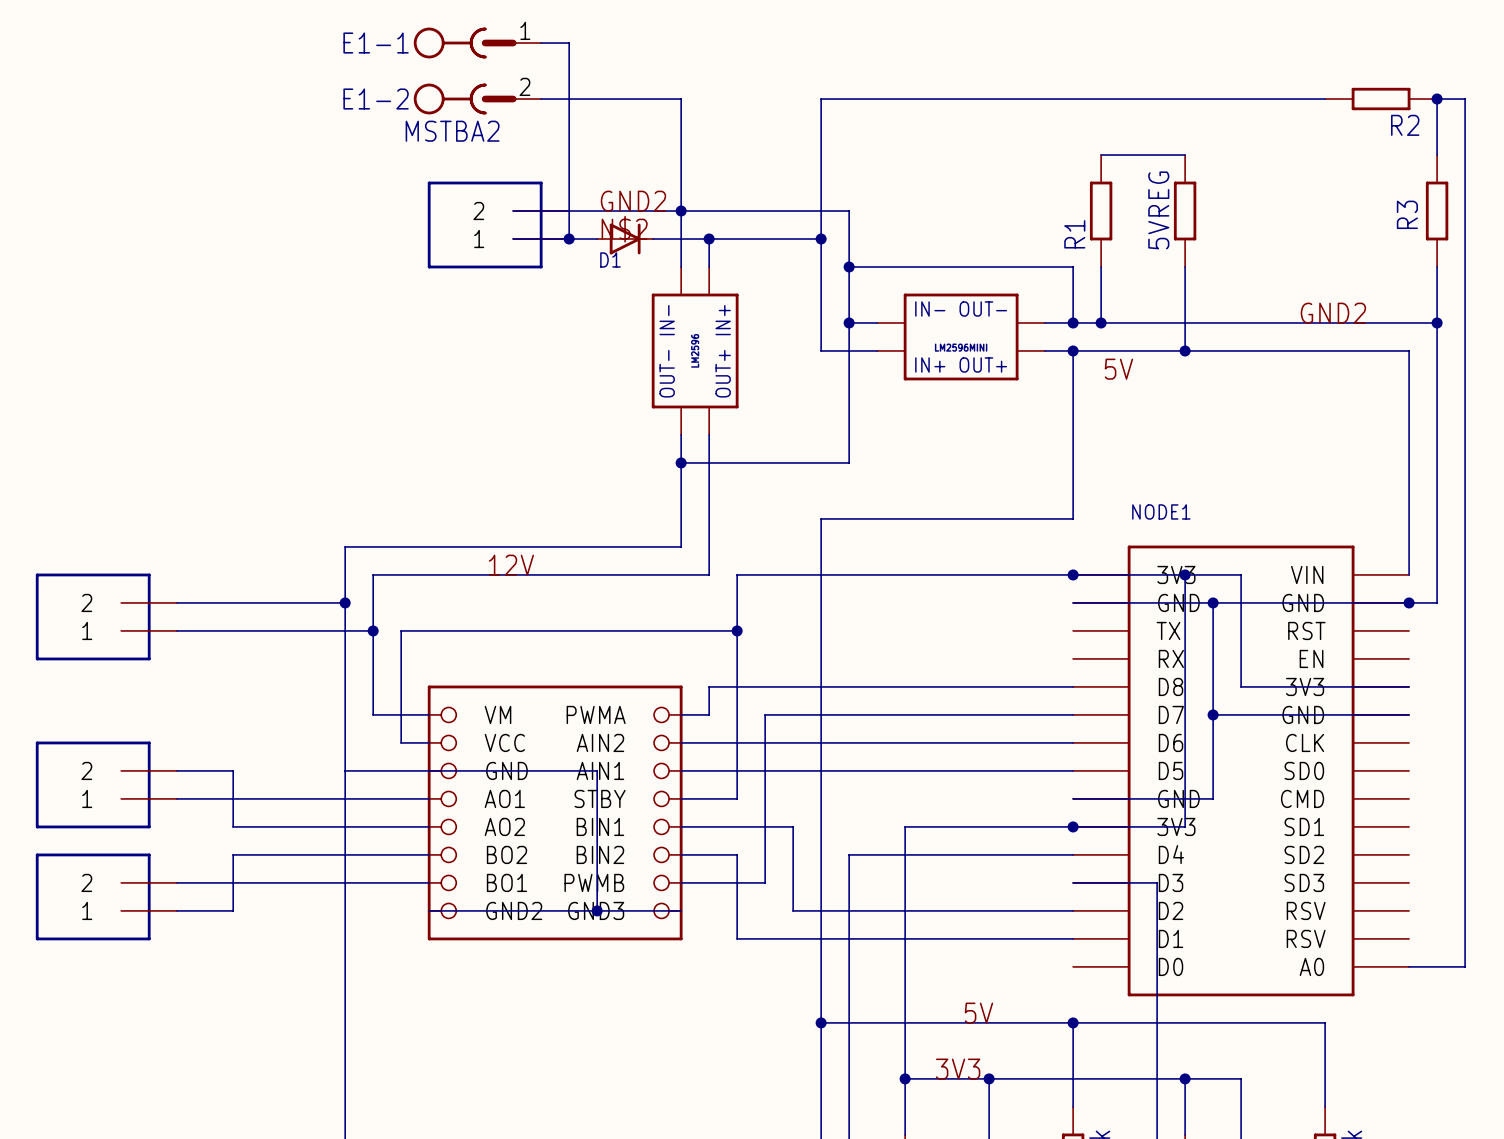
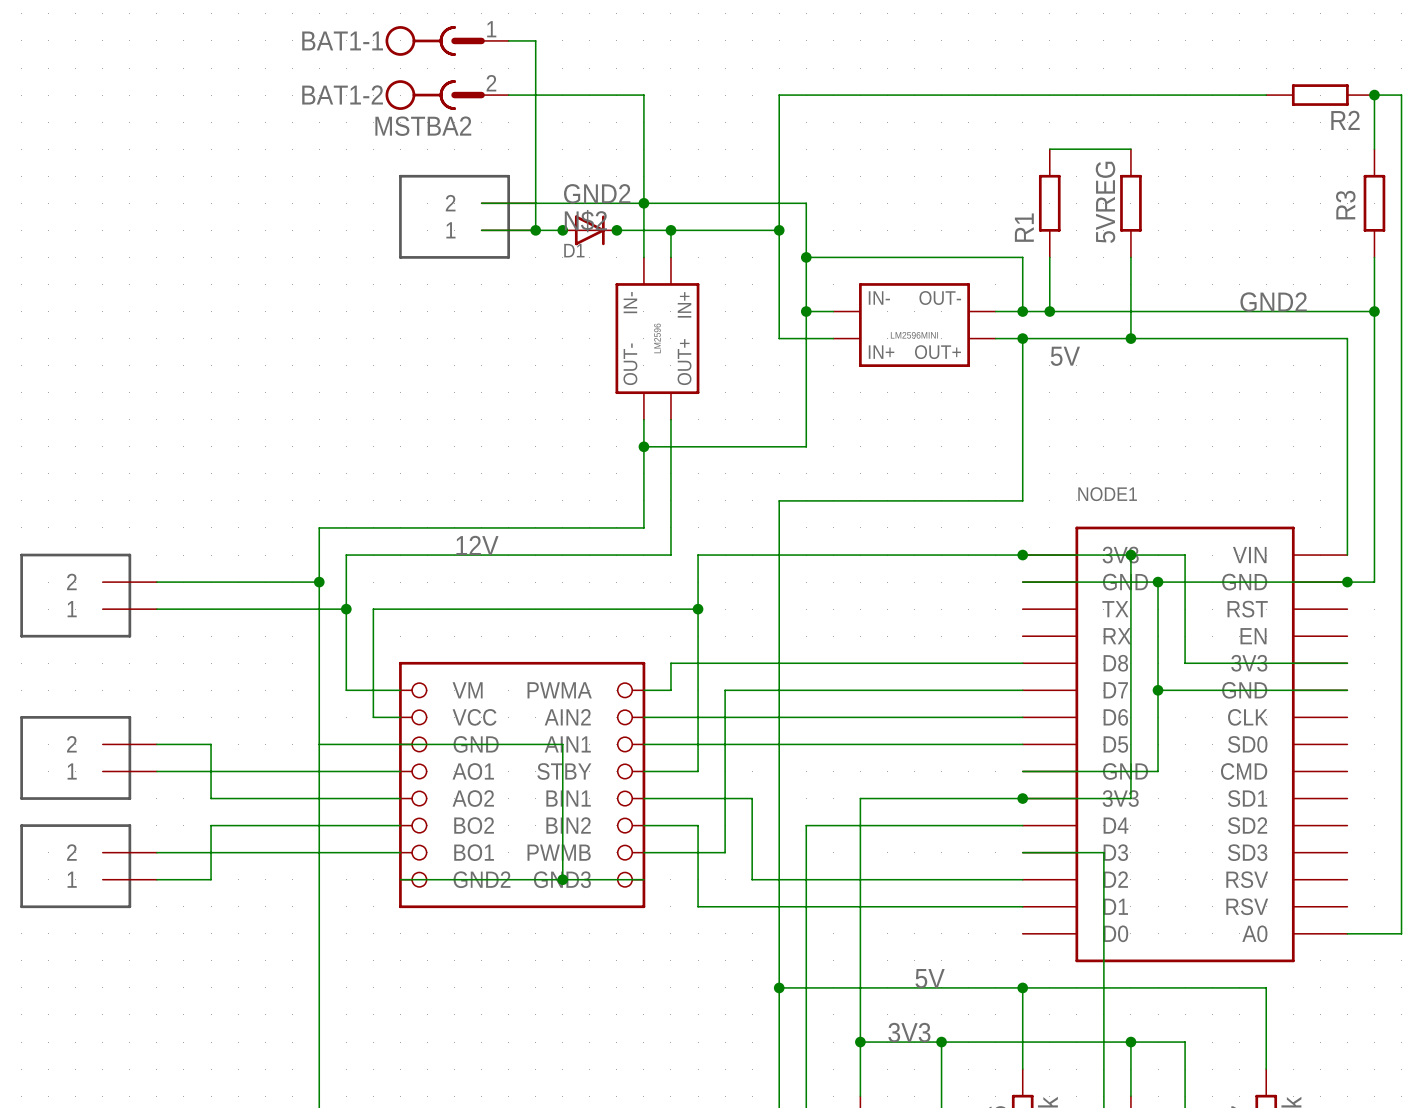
E1-1 name: E1-1 (376, 43) -> BAT1-1 (342, 40)
E1-2 name: E1-2 (376, 99) -> BAT1-2 (342, 94)
junction: none -> (562, 230)
junction: none -> (616, 230)

